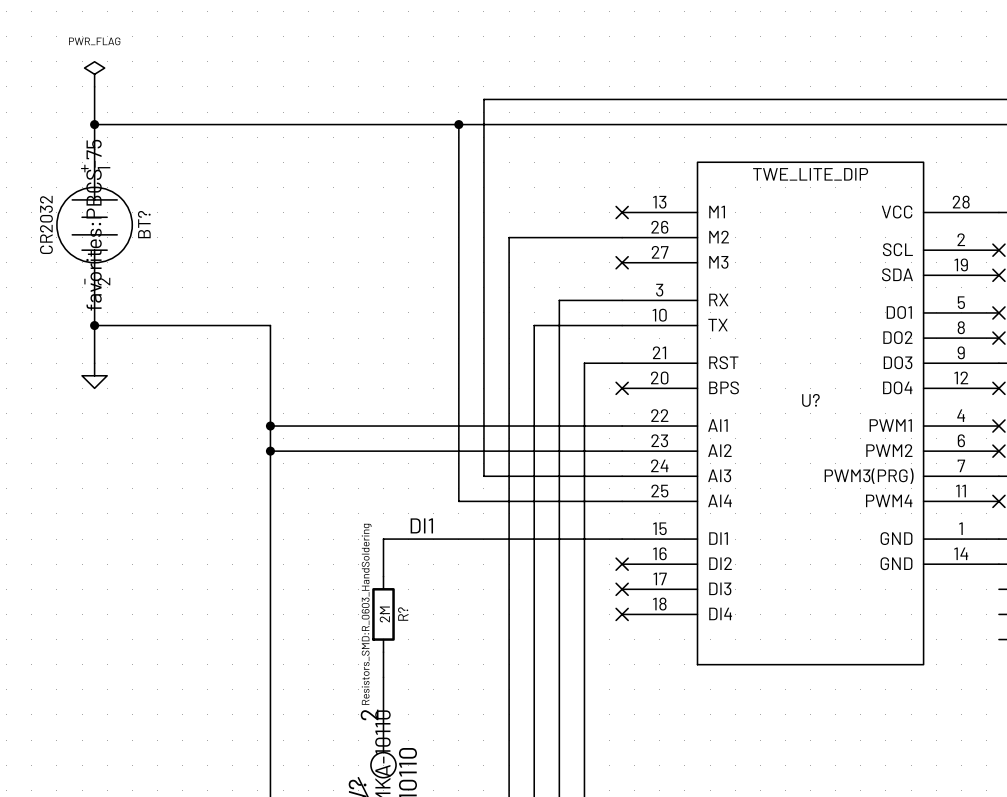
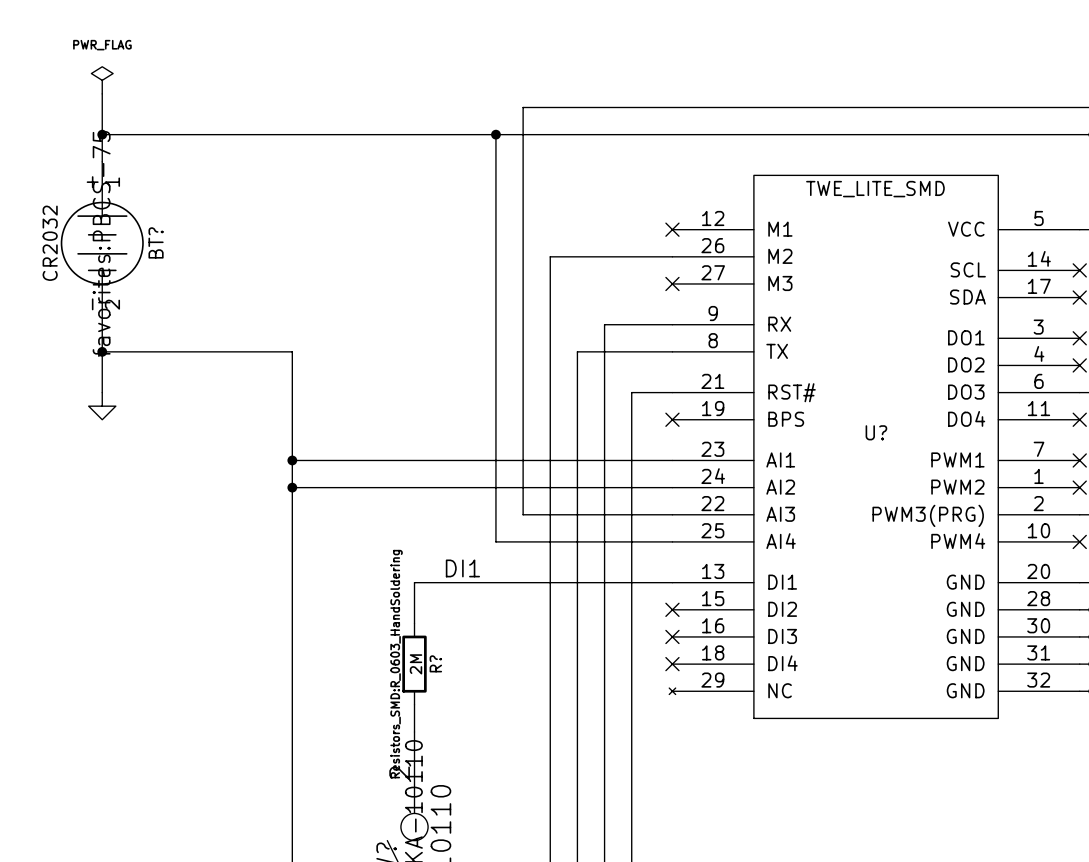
U? symbol: [622, 162, 999, 665] -> [669, 175, 1080, 719]
U? value: TWE_LITE_DIP (810, 174) -> TWE_LITE_SMD (875, 189)

